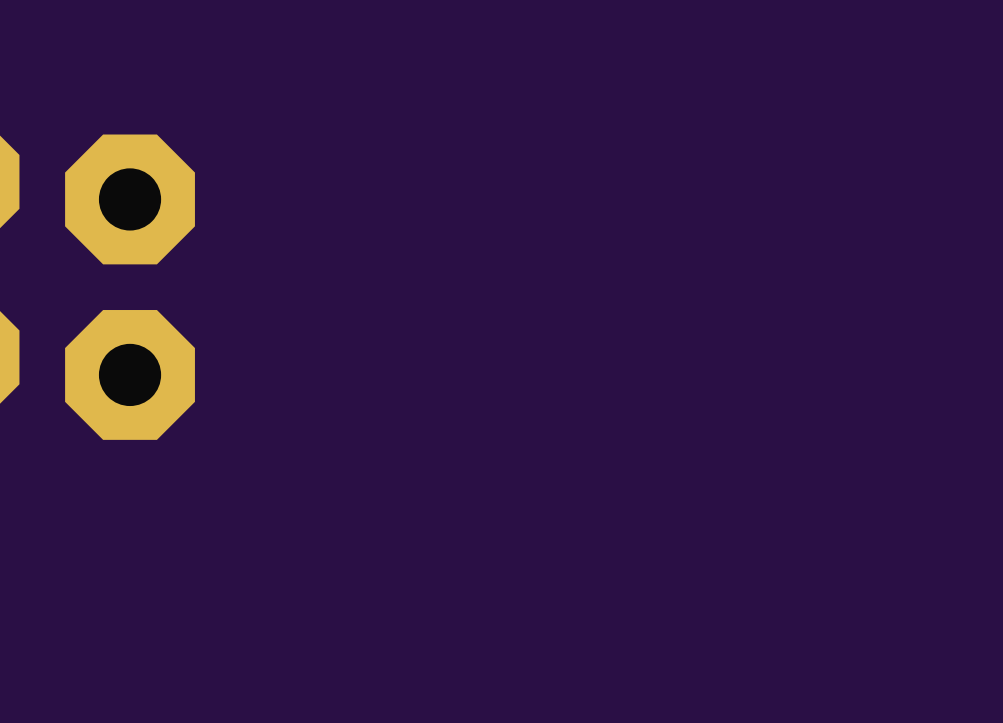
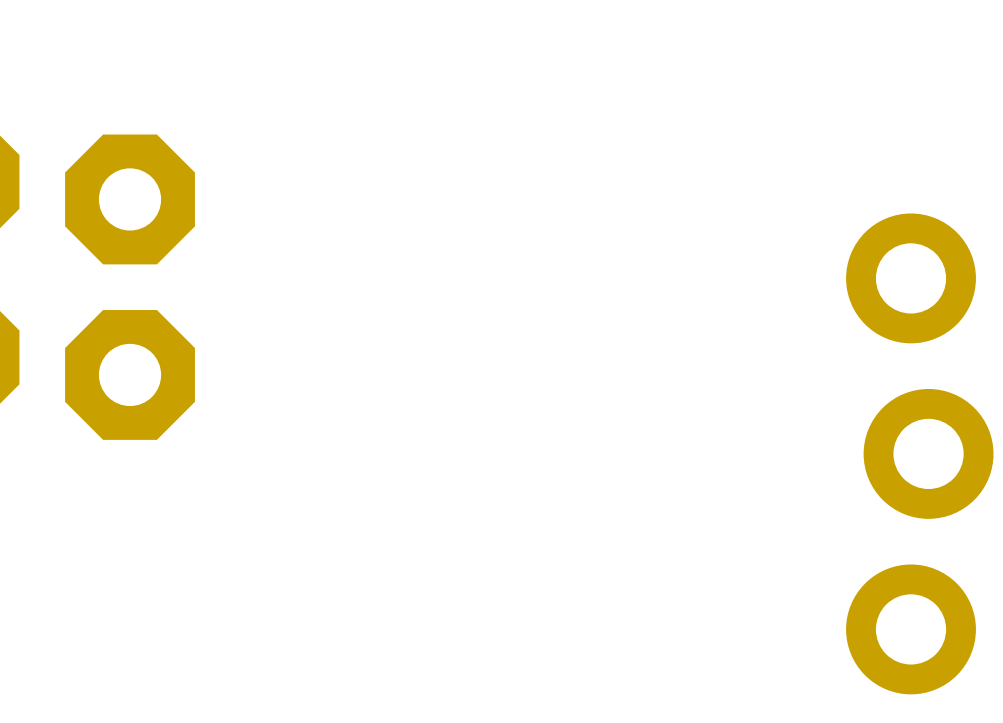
part: none -> (919, 453)

